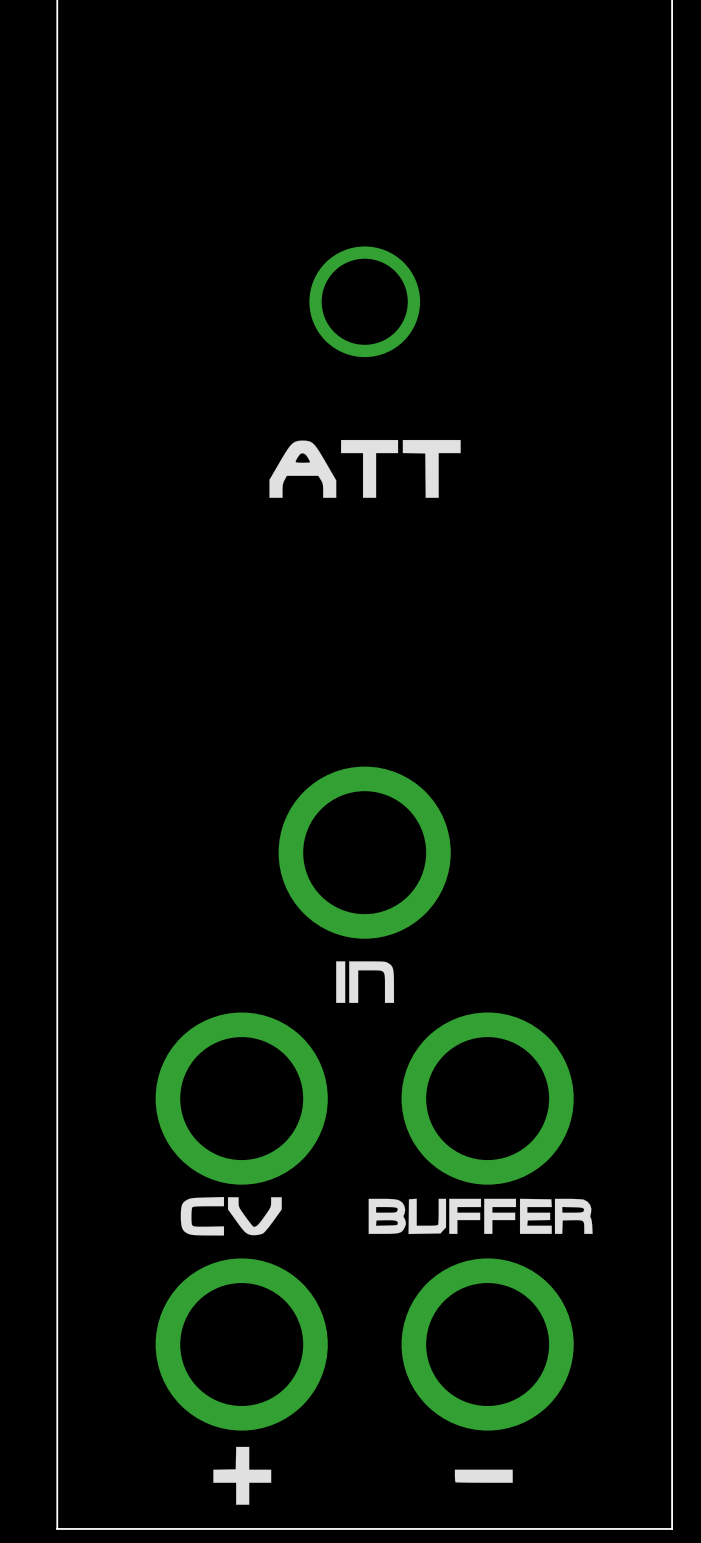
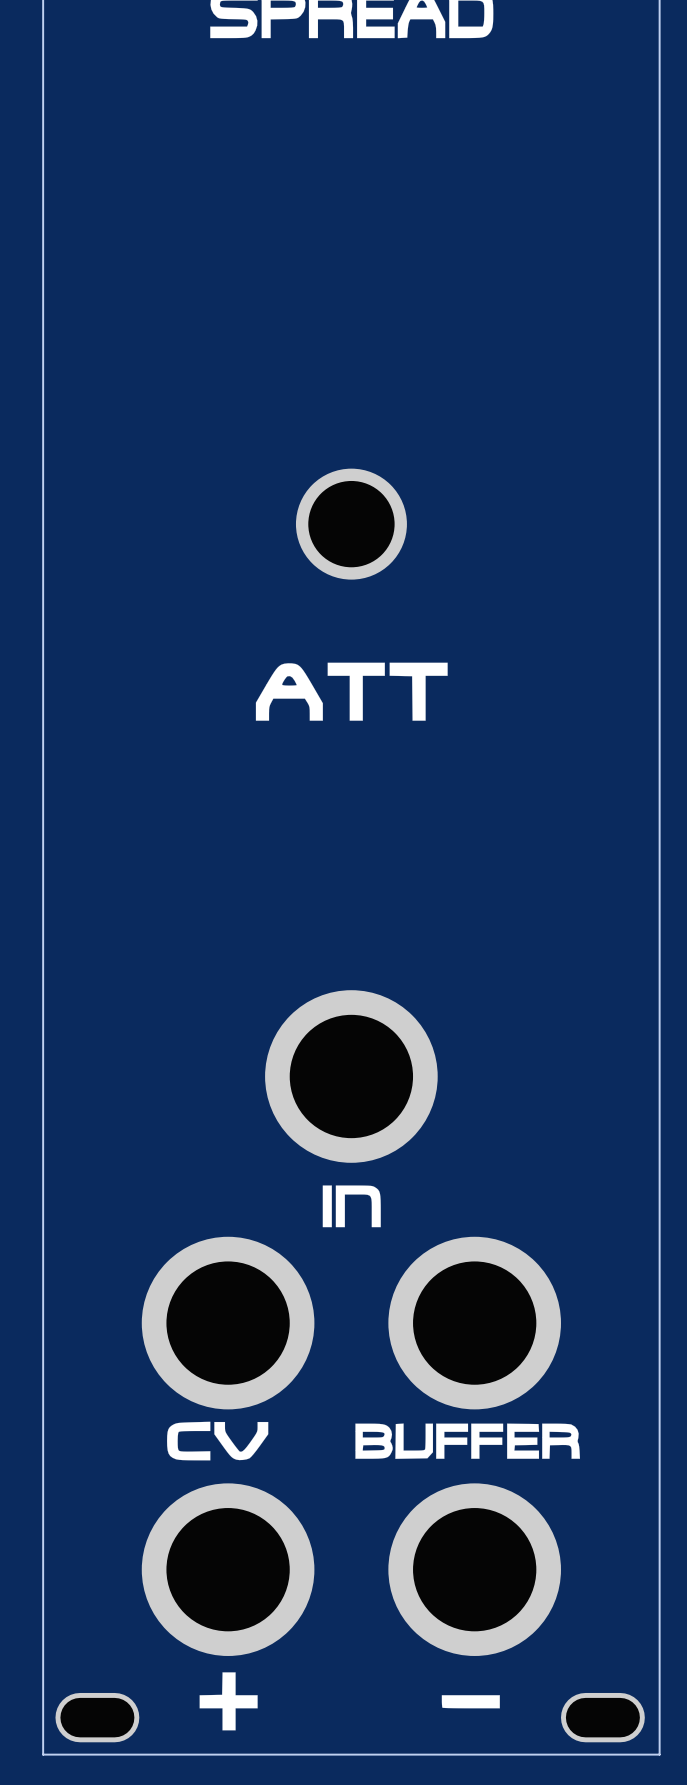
part: none -> (97, 1717)
part: none -> (602, 1717)

